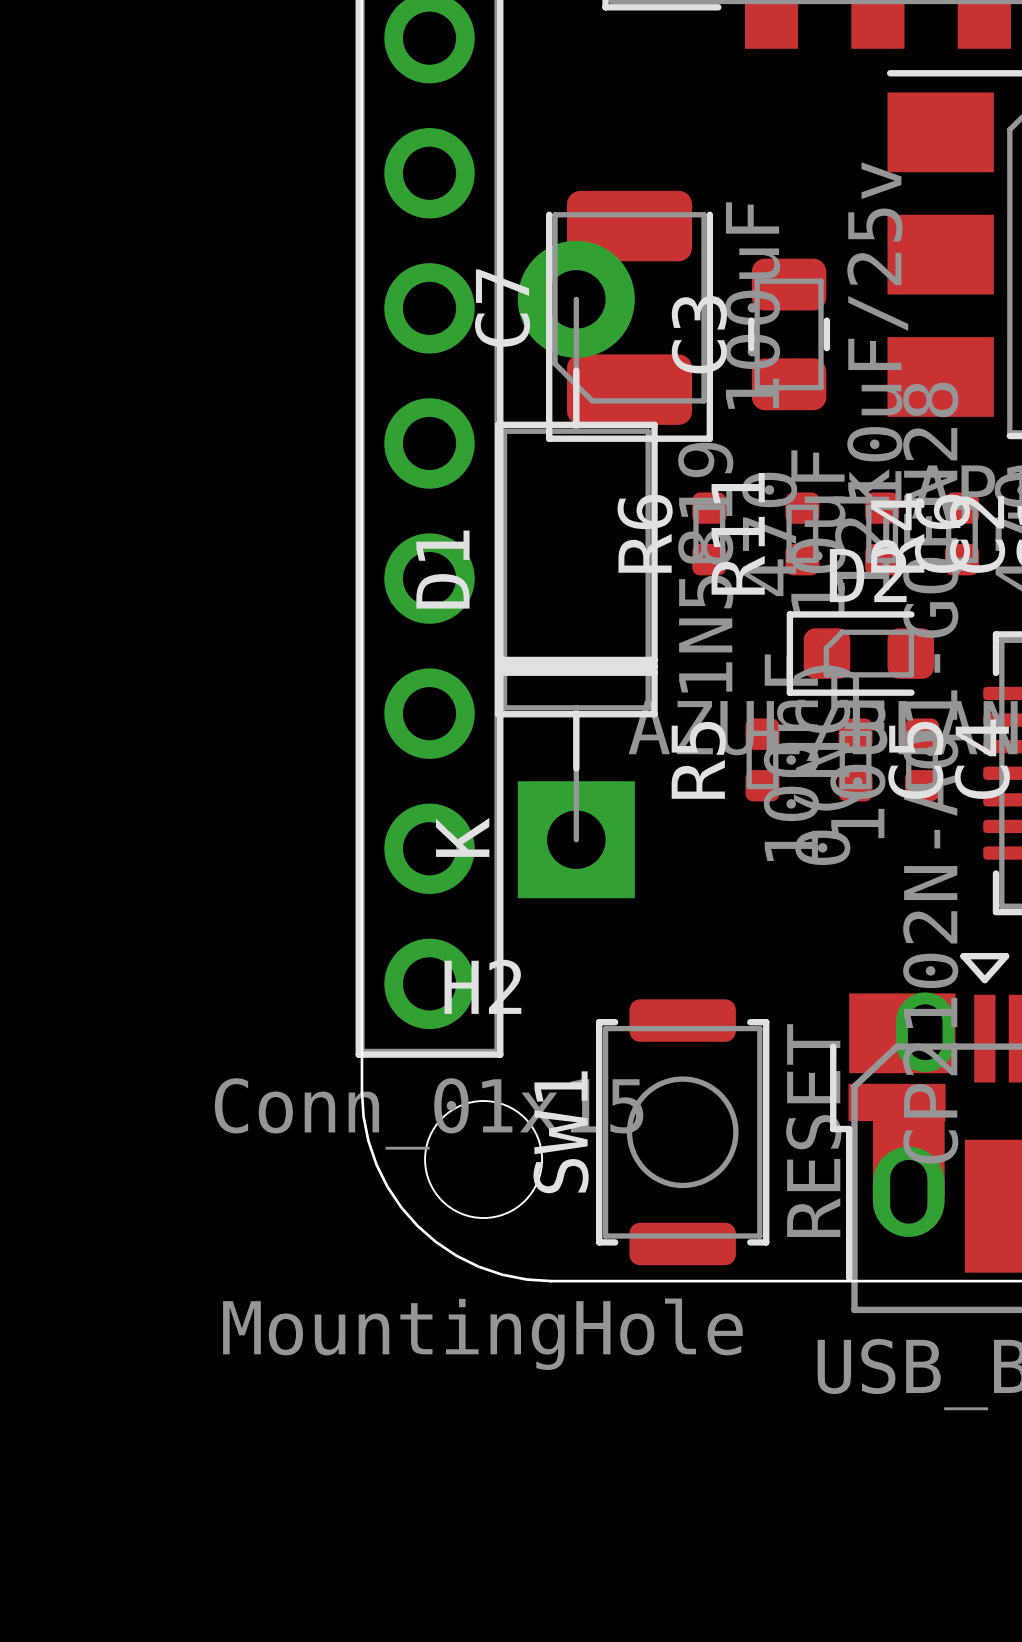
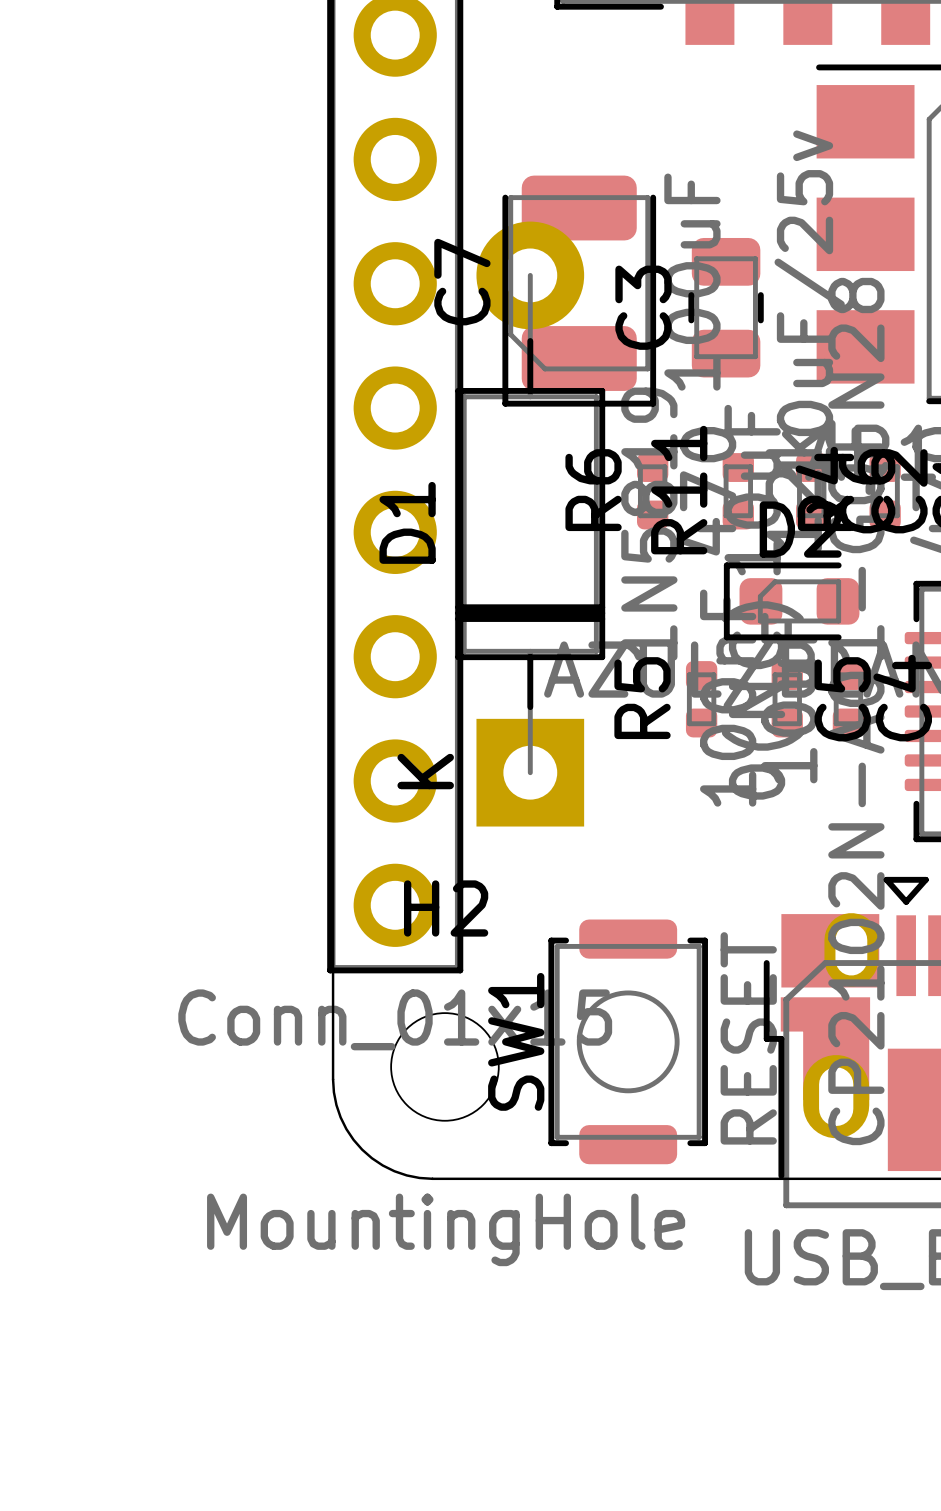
board edge: (361, 1091) (363, 1116) (368, 1140) (376, 1164) (387, 1186) (401, 1207) (417, 1225) (435, 1242) (456, 1255) (478, 1266) (502, 1274) (526, 1279) (551, 1281) -> (333, 1004) (333, 1079) (336, 1105) (346, 1129) (362, 1149) (382, 1165) (406, 1175) (432, 1178) (507, 1178)

